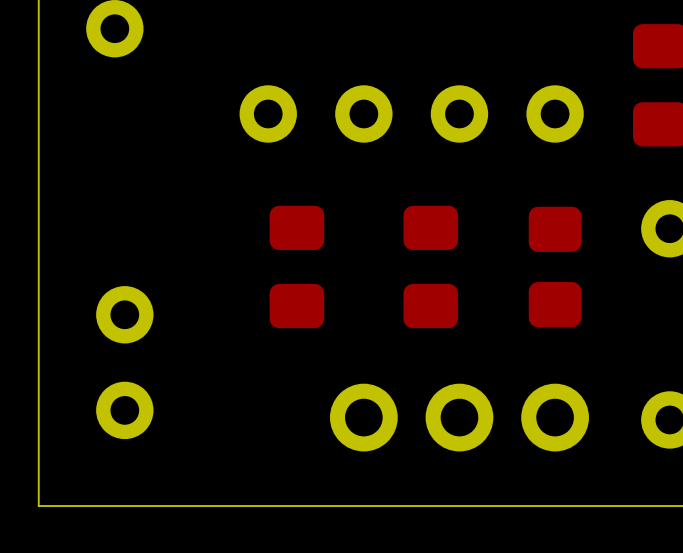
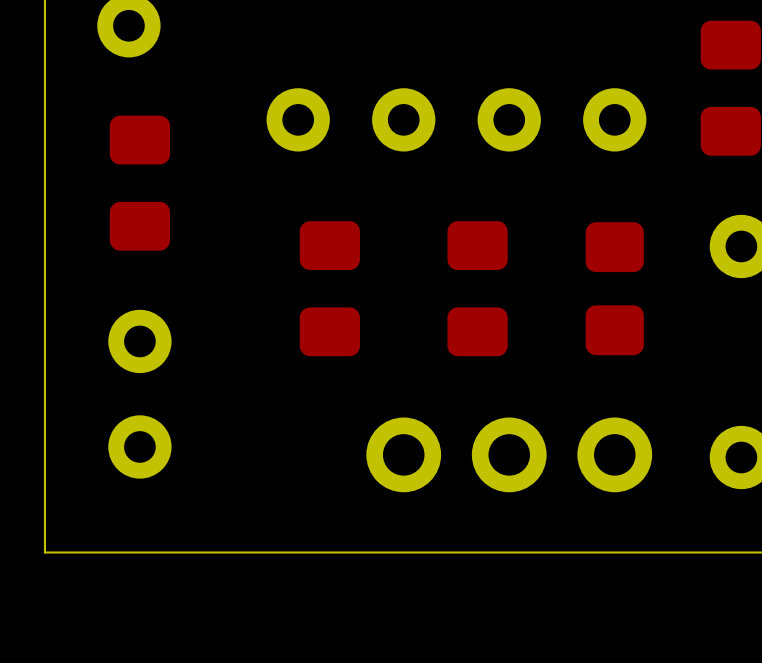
part: none -> (139, 183)

